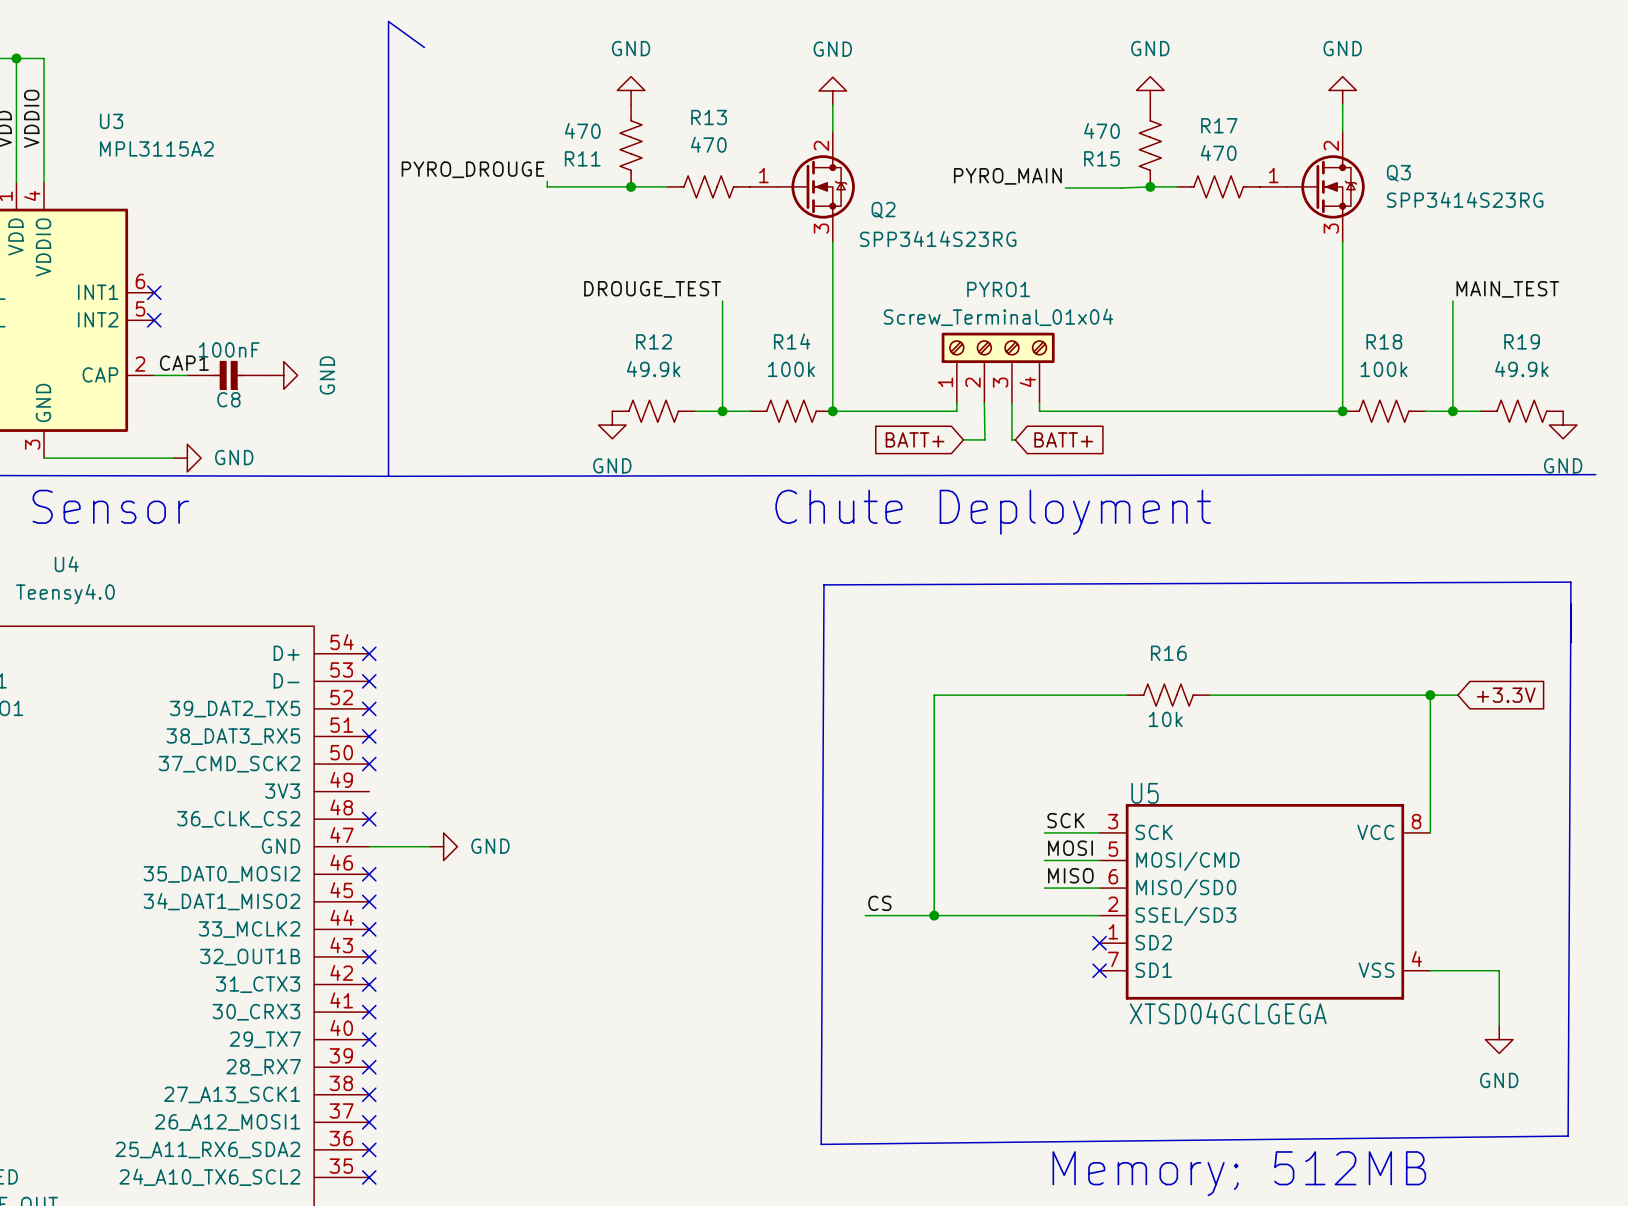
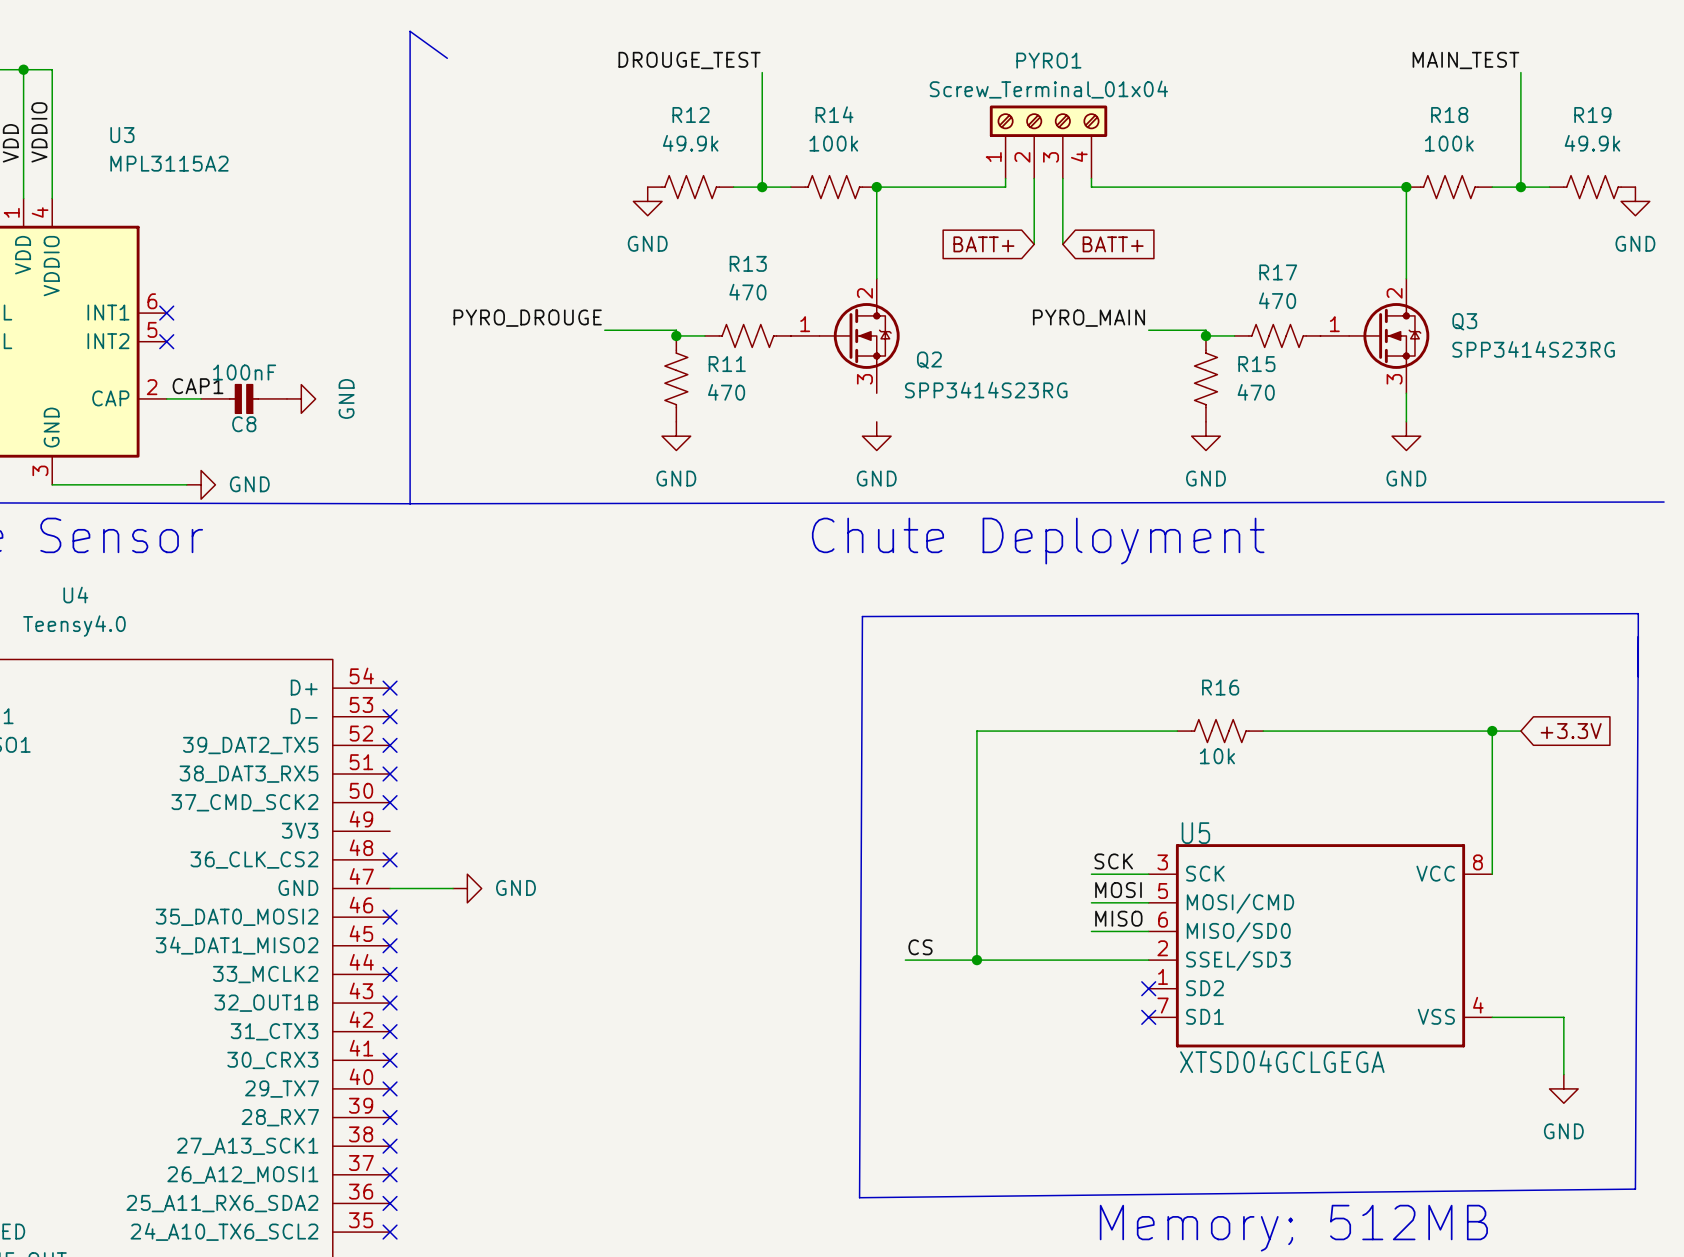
power symbol rotation: 0° (631, 90) -> 180° (647, 201)
power symbol position: GND (631, 90) -> GND (647, 201)
power symbol: GND (1150, 90) -> none
power symbol: GND (1342, 90) -> none
power symbol: GND (832, 91) -> none
wire: (832, 104) (832, 131) -> none
wire: (1342, 104) (1342, 131) -> (1406, 393) (1406, 421)
R11 value position: 470 (582, 130) -> 470 (726, 392)
R15 value position: 470 (1101, 130) -> 470 (1256, 392)
R11 position: (631, 145) -> (676, 378)
R15 position: (1150, 145) -> (1205, 378)
R11 name position: R11 (582, 158) -> R11 (727, 364)
R15 name position: R15 (1101, 158) -> R15 (1256, 364)
wire: none -> (1005, 178) (1005, 187) (876, 187) (876, 278)
wire: none -> (1034, 178) (1034, 244)
wire: none -> (1062, 178) (1062, 244)
wire: none -> (1091, 178) (1091, 187) (1406, 187) (1406, 278)
label position: PYRO_DROUGE (473, 169) -> PYRO_DROUGE (527, 318)
junction: none -> (762, 187)
junction: none -> (876, 187)
junction: none -> (1406, 187)
junction: none -> (1520, 187)
label position: PYRO_MAIN (1007, 176) -> PYRO_MAIN (1088, 318)
wire: (547, 181) (547, 186) (667, 186) -> none
power symbol: none -> GND (1635, 201)
junction: (631, 186) -> none
R13 position: (708, 186) -> (747, 335)
Q2 position: (802, 186) -> (845, 335)
junction: (1150, 186) -> none
wire: (1177, 186) (1065, 188) -> none
R17 position: (1218, 186) -> (1277, 335)
Q3 position: (1312, 186) -> (1374, 335)
global label: none -> BATT+ (983, 244)
global label: none -> BATT+ (1113, 244)
wire: (832, 242) (832, 411) (956, 411) (956, 402) -> none
wire: (1342, 242) (1342, 411) (1039, 411) (1039, 402) -> none
label position: DROUGE_TEST (652, 289) -> DROUGE_TEST (689, 60)
label position: MAIN_TEST (1507, 289) -> MAIN_TEST (1465, 60)
wire: (722, 301) (722, 411) -> (762, 72) (762, 187)
wire: (1452, 301) (1452, 411) -> (1520, 72) (1520, 187)
wire: none -> (604, 330) (676, 330) (676, 335) (704, 335)
wire: none -> (1148, 330) (1205, 330) (1205, 335) (1234, 335)
junction: none -> (676, 335)
junction: none -> (1205, 335)
PYRO1 position: (998, 367) -> (1048, 142)
wire: (984, 402) (984, 439) (963, 439) -> none
wire: (1011, 402) (1011, 439) (1015, 439) -> none
R12 position: (653, 411) -> (690, 187)
wire: (695, 411) (750, 411) -> (733, 187) (790, 187)
junction: (722, 411) -> none
R14 position: (791, 411) -> (833, 187)
junction: (832, 411) -> none
power symbol: none -> GND (876, 436)
power symbol: none -> GND (1205, 436)
junction: (1342, 411) -> none
power symbol: none -> GND (1406, 436)
R18 position: (1384, 411) -> (1449, 187)
wire: (1425, 411) (1480, 411) -> (1492, 187) (1549, 187)
junction: (1452, 411) -> none
R19 position: (1521, 411) -> (1592, 187)
power symbol position: GND (612, 425) -> GND (676, 436)
power symbol: GND (1563, 425) -> none
global label: BATT+ (915, 439) -> none
global label: BATT+ (1063, 439) -> none

